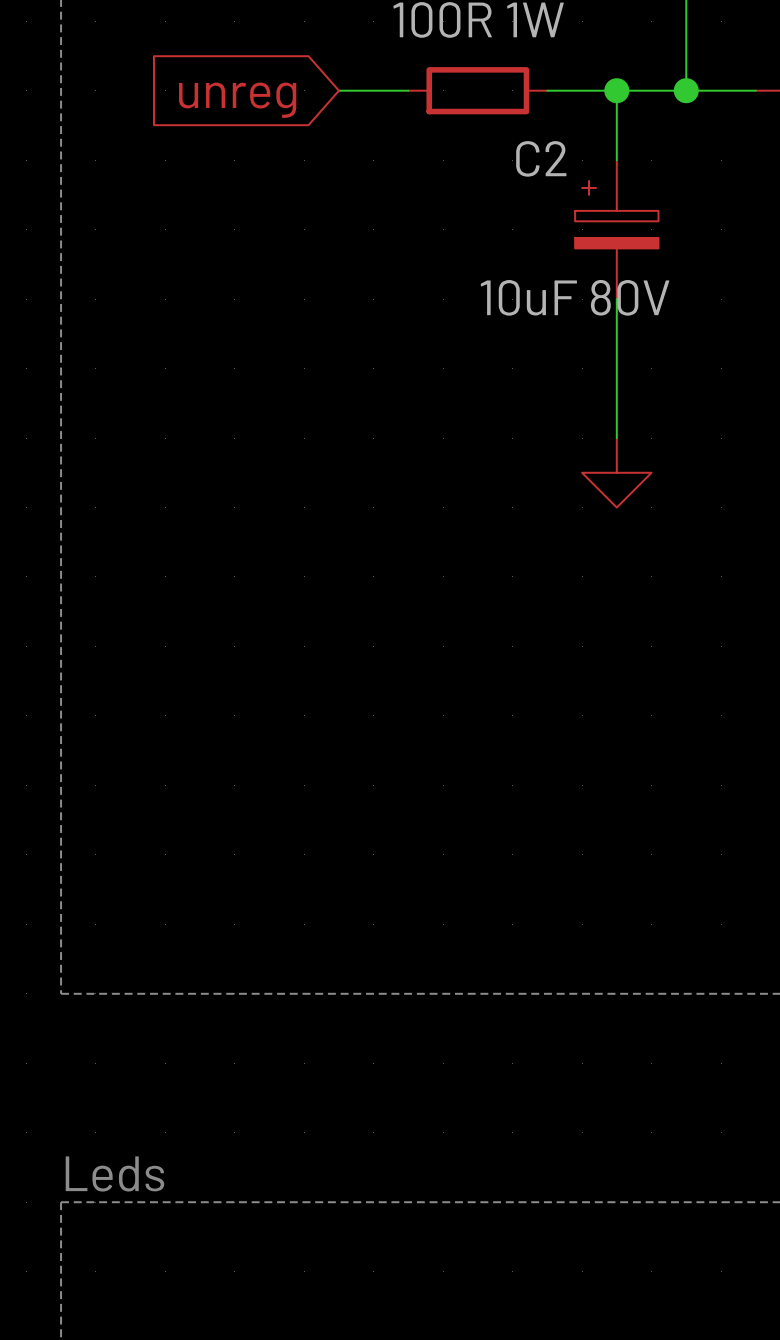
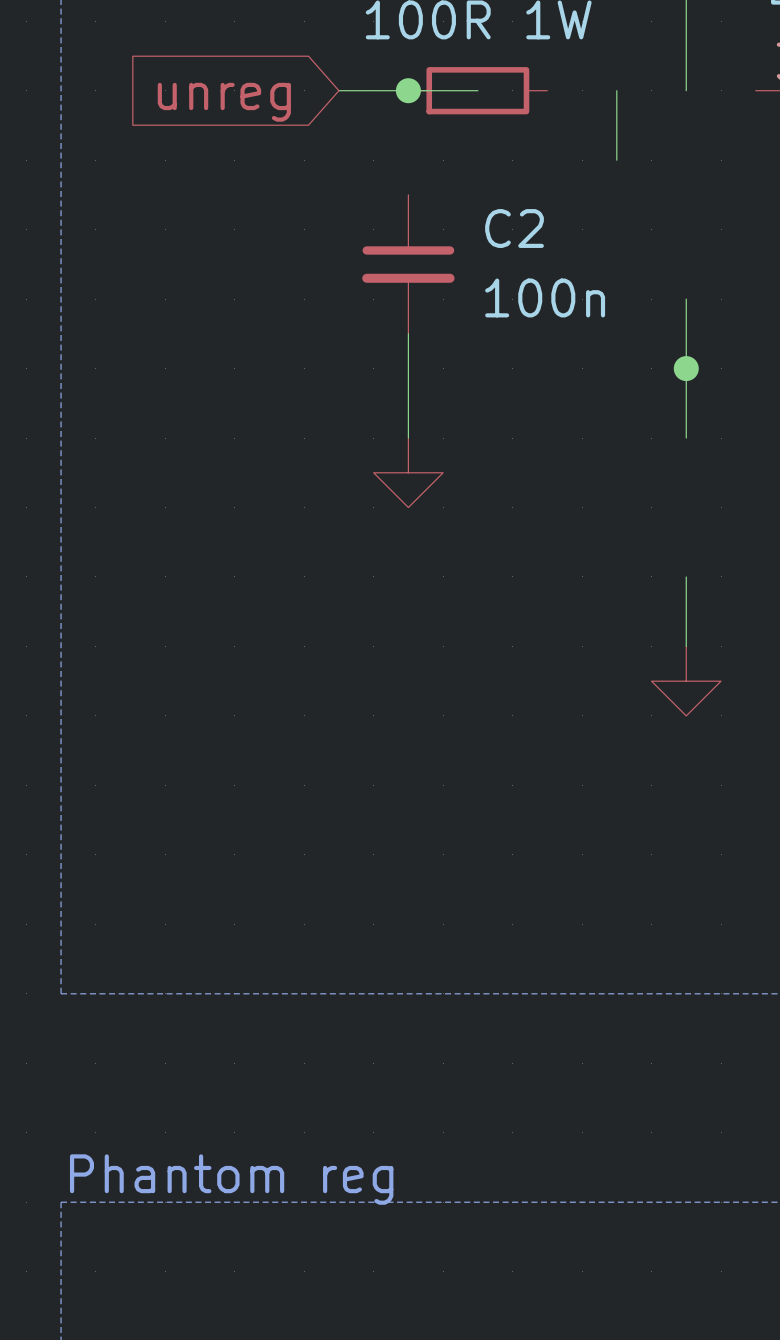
wire: none -> (408, 90) (477, 90)
junction: none -> (408, 90)
wire: (547, 90) (755, 90) -> none
junction: (616, 90) -> none
junction: (686, 90) -> none
C2 name position: C2 (541, 158) -> C2 (514, 228)
C2 symbol: [575, 160, 659, 300] -> [362, 194, 455, 334]
C2 value: 10uF 80V (575, 297) -> 100n (545, 297)
wire: (616, 299) (616, 438) -> (686, 299) (686, 438)
wire: none -> (408, 333) (408, 438)
junction: none -> (686, 368)
power symbol: none -> (408, 472)
power symbol: (616, 472) -> none
wire: none -> (686, 576) (686, 646)
power symbol: none -> (686, 681)
text: Leds (114, 1173) -> Phantom reg (231, 1179)

